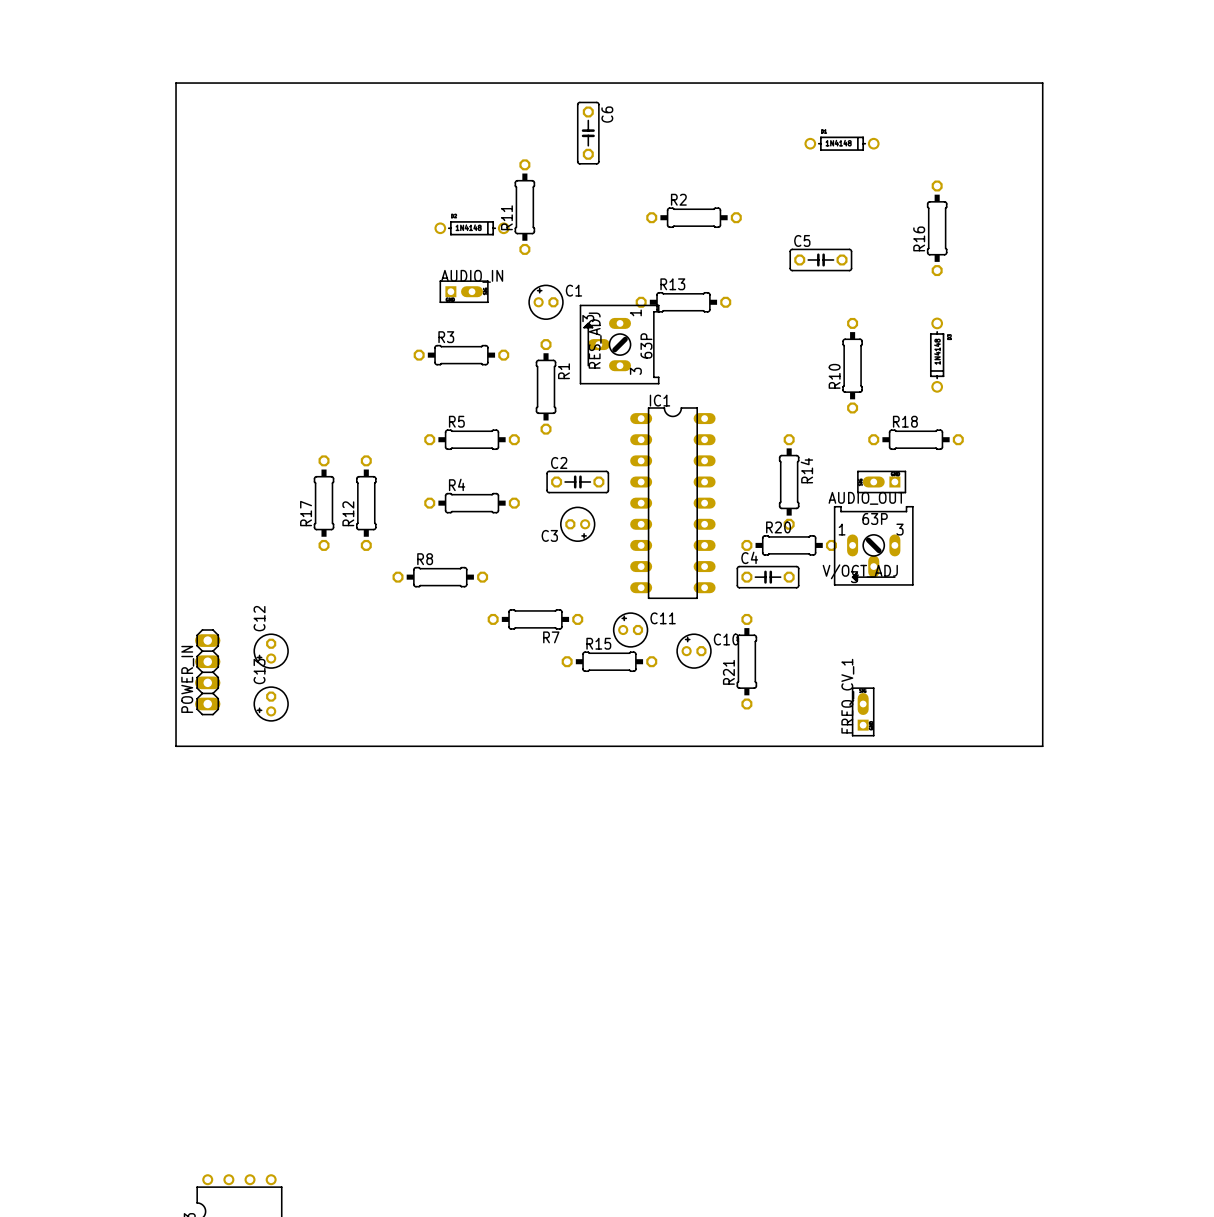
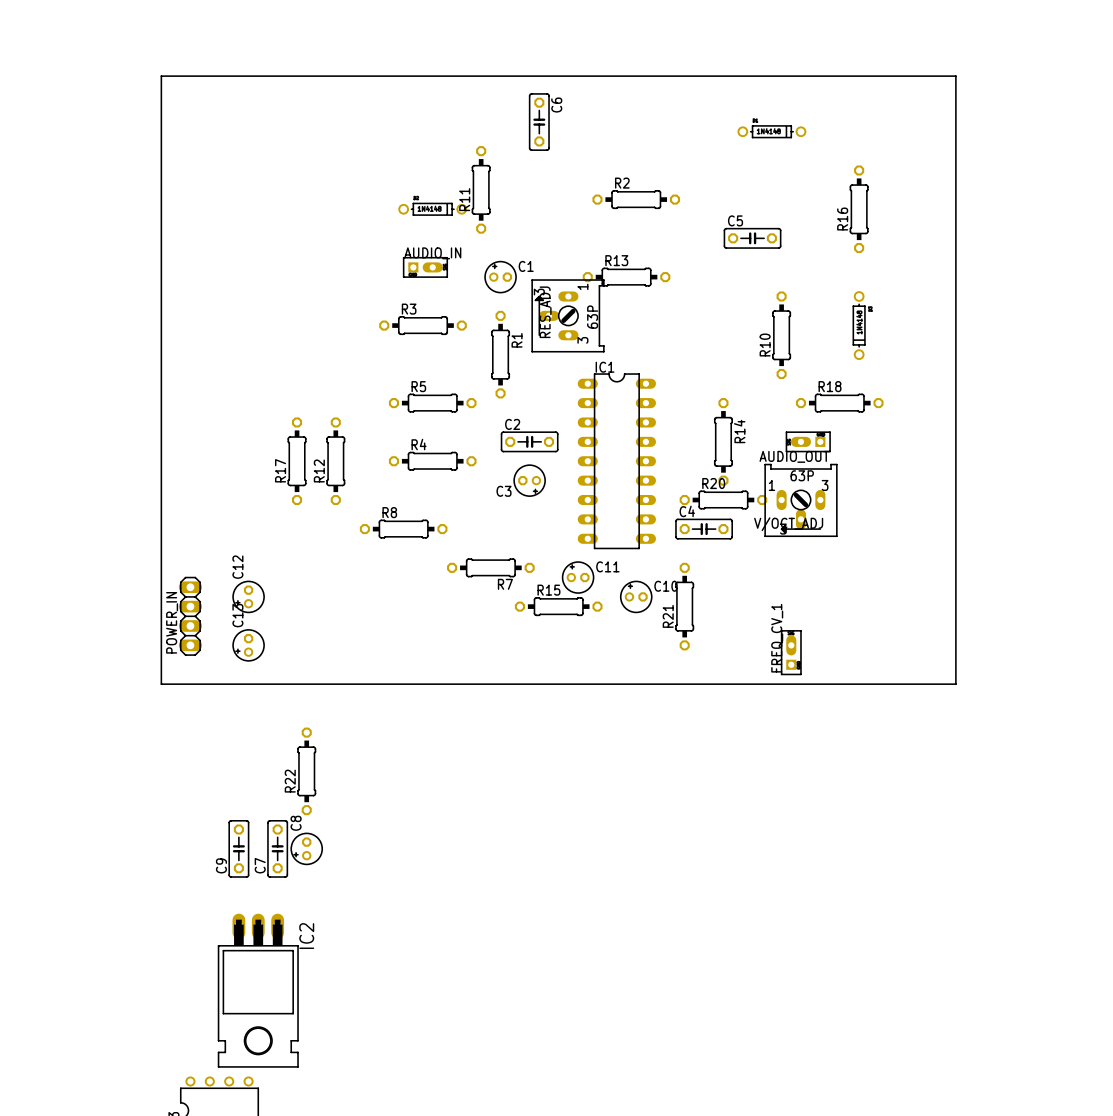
R22: none -> (306, 771)
C9: none -> (238, 848)
C7: none -> (277, 848)
C8: none -> (306, 848)
IC2: none -> (258, 990)

